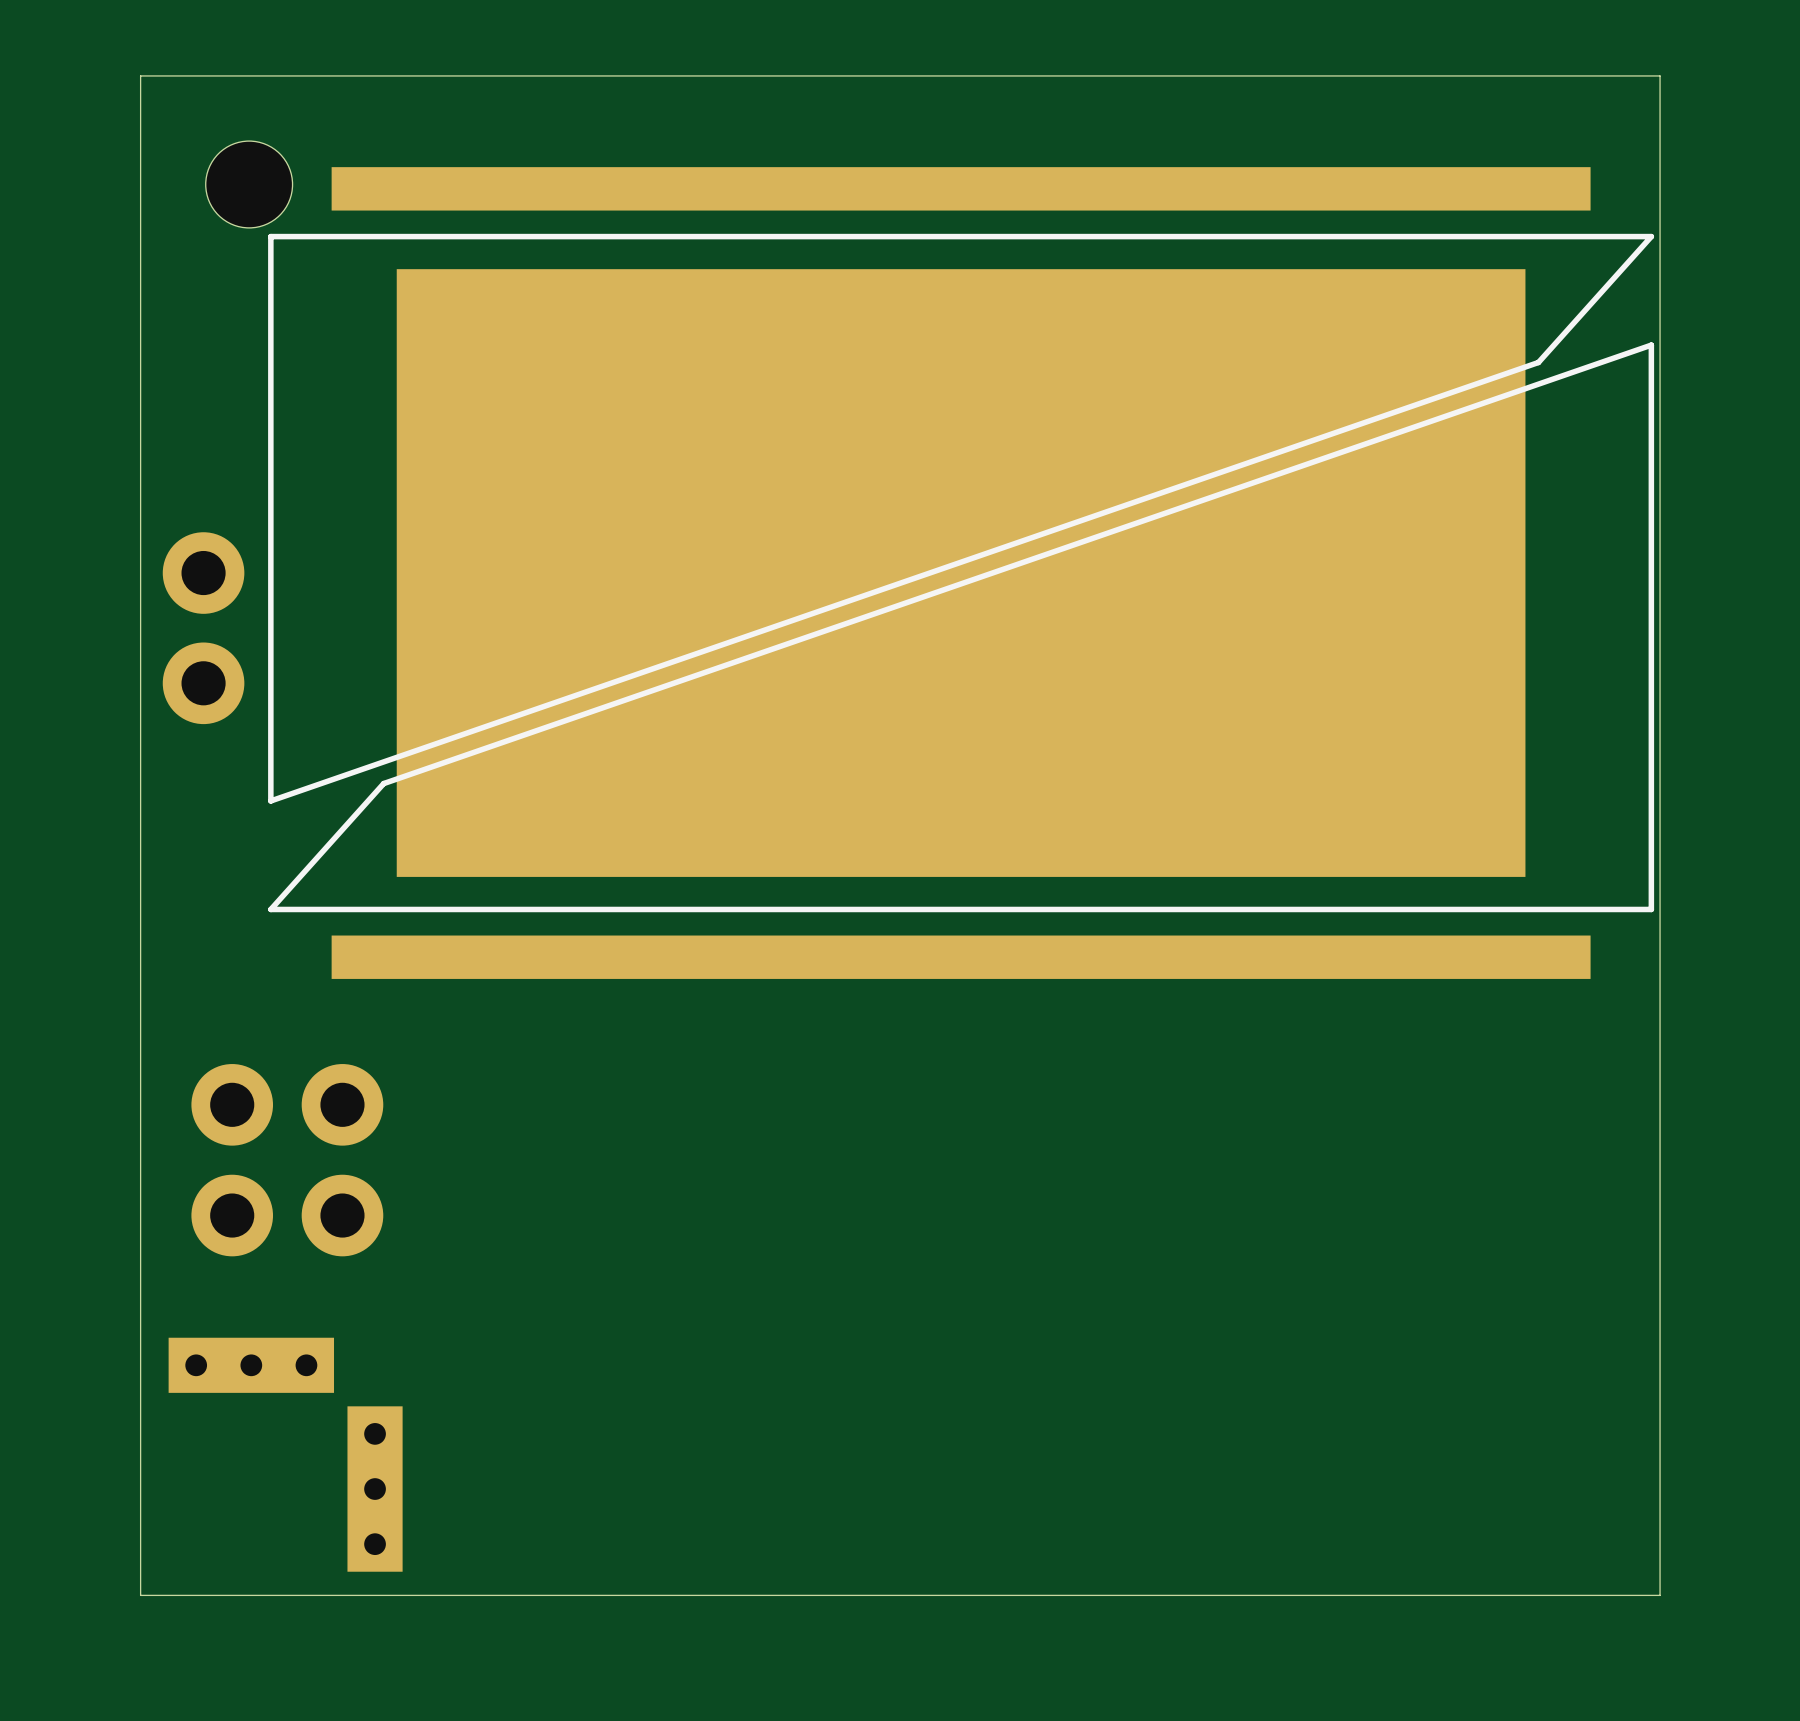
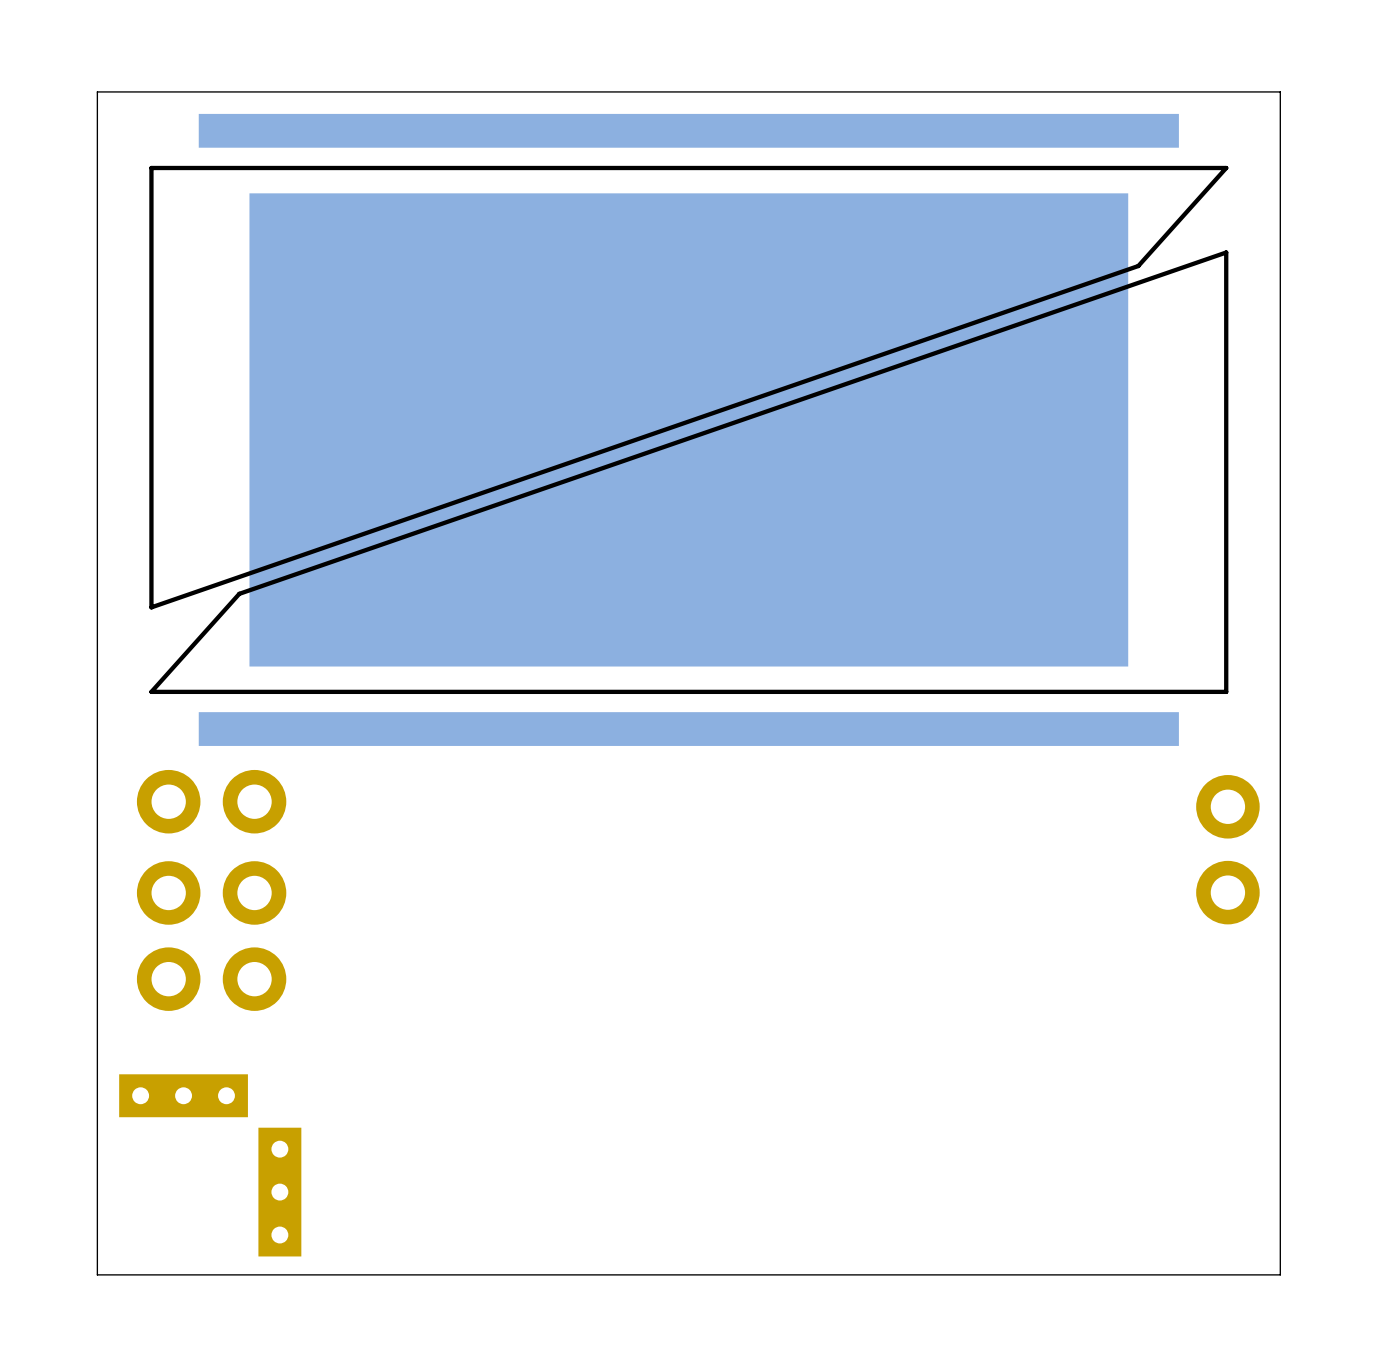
hole: (249, 184) -> none
part position: (961, 573) -> (688, 429)
part rotation: 0° (203, 628) -> 90° clockwise (211, 801)
part position: (203, 628) -> (211, 801)
part: none -> (1227, 849)

